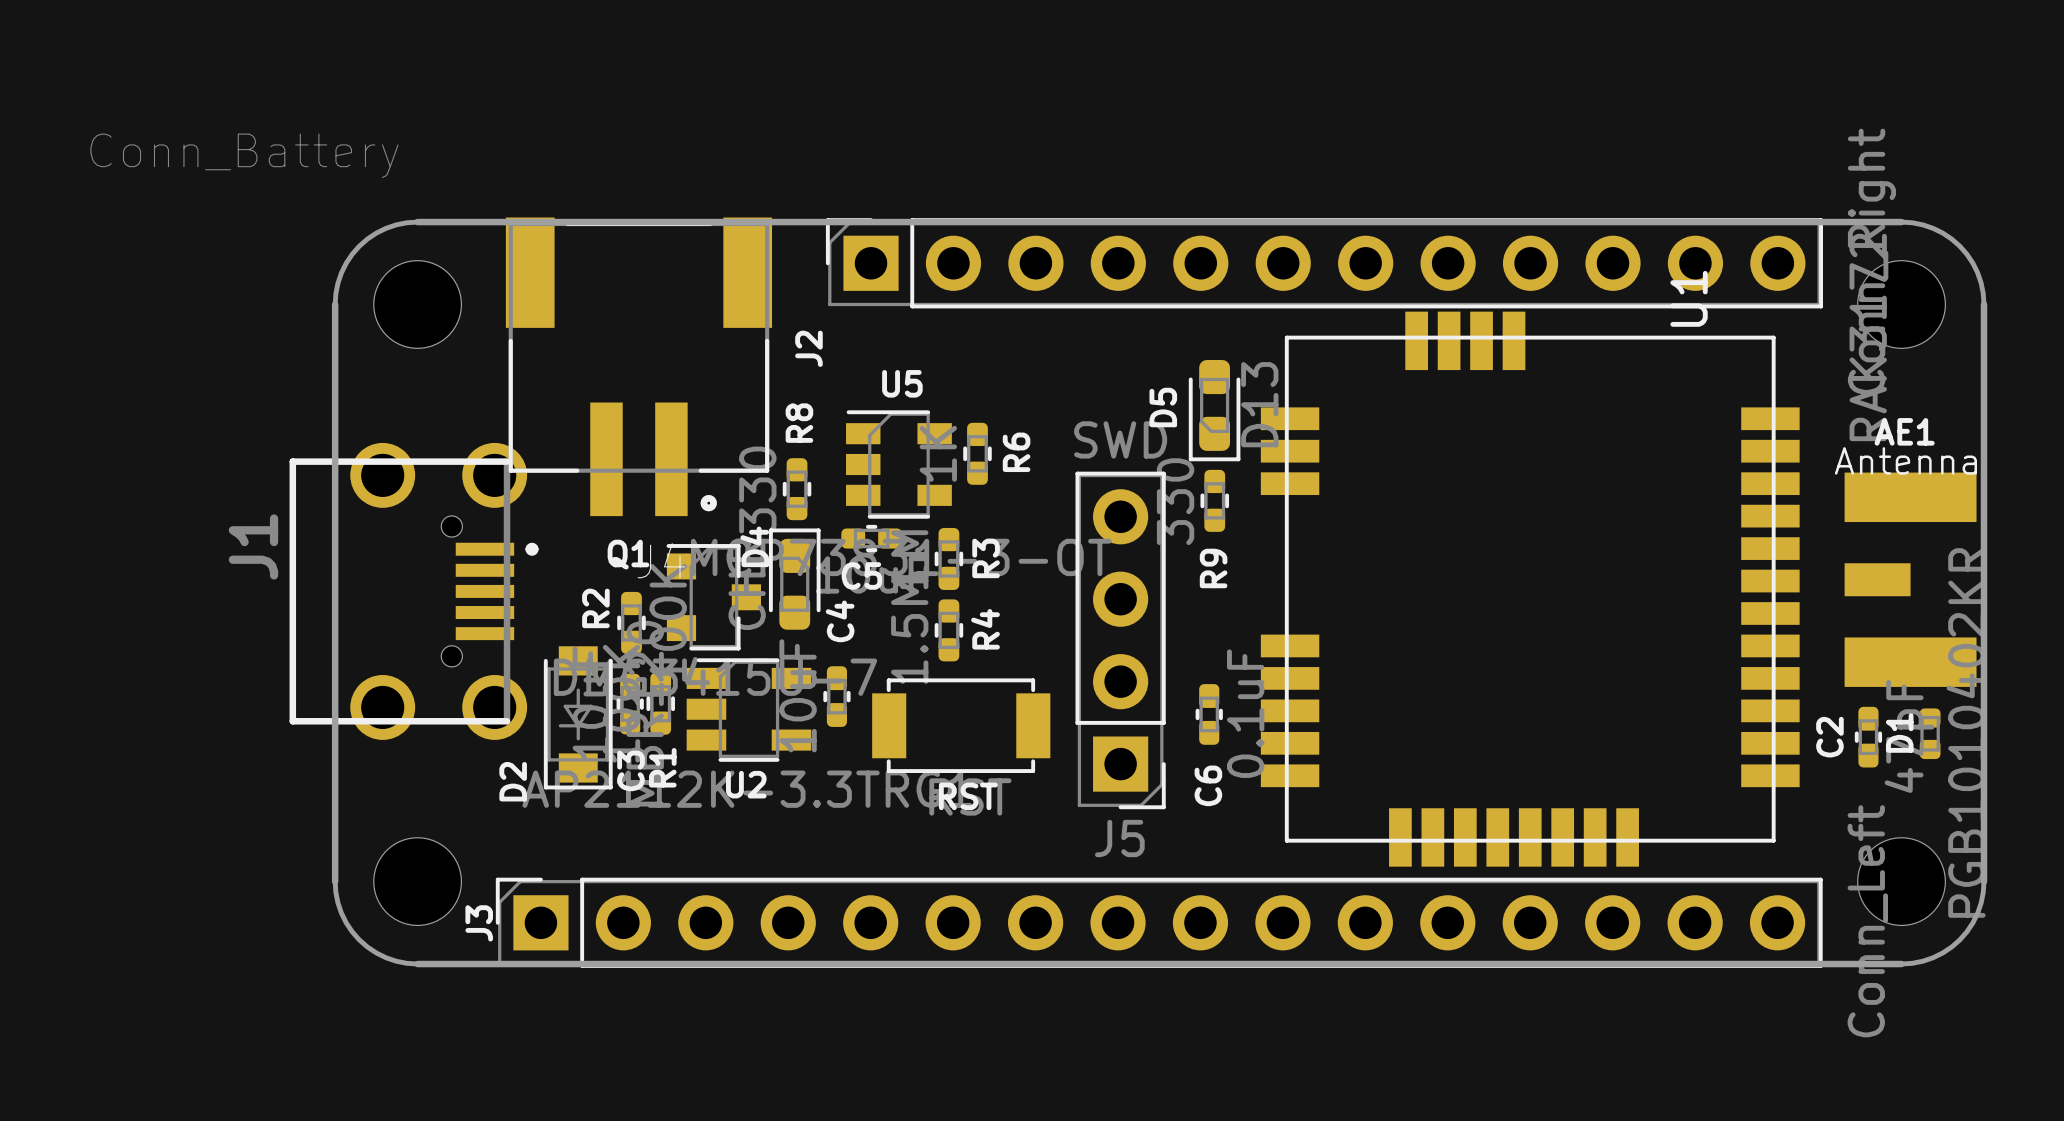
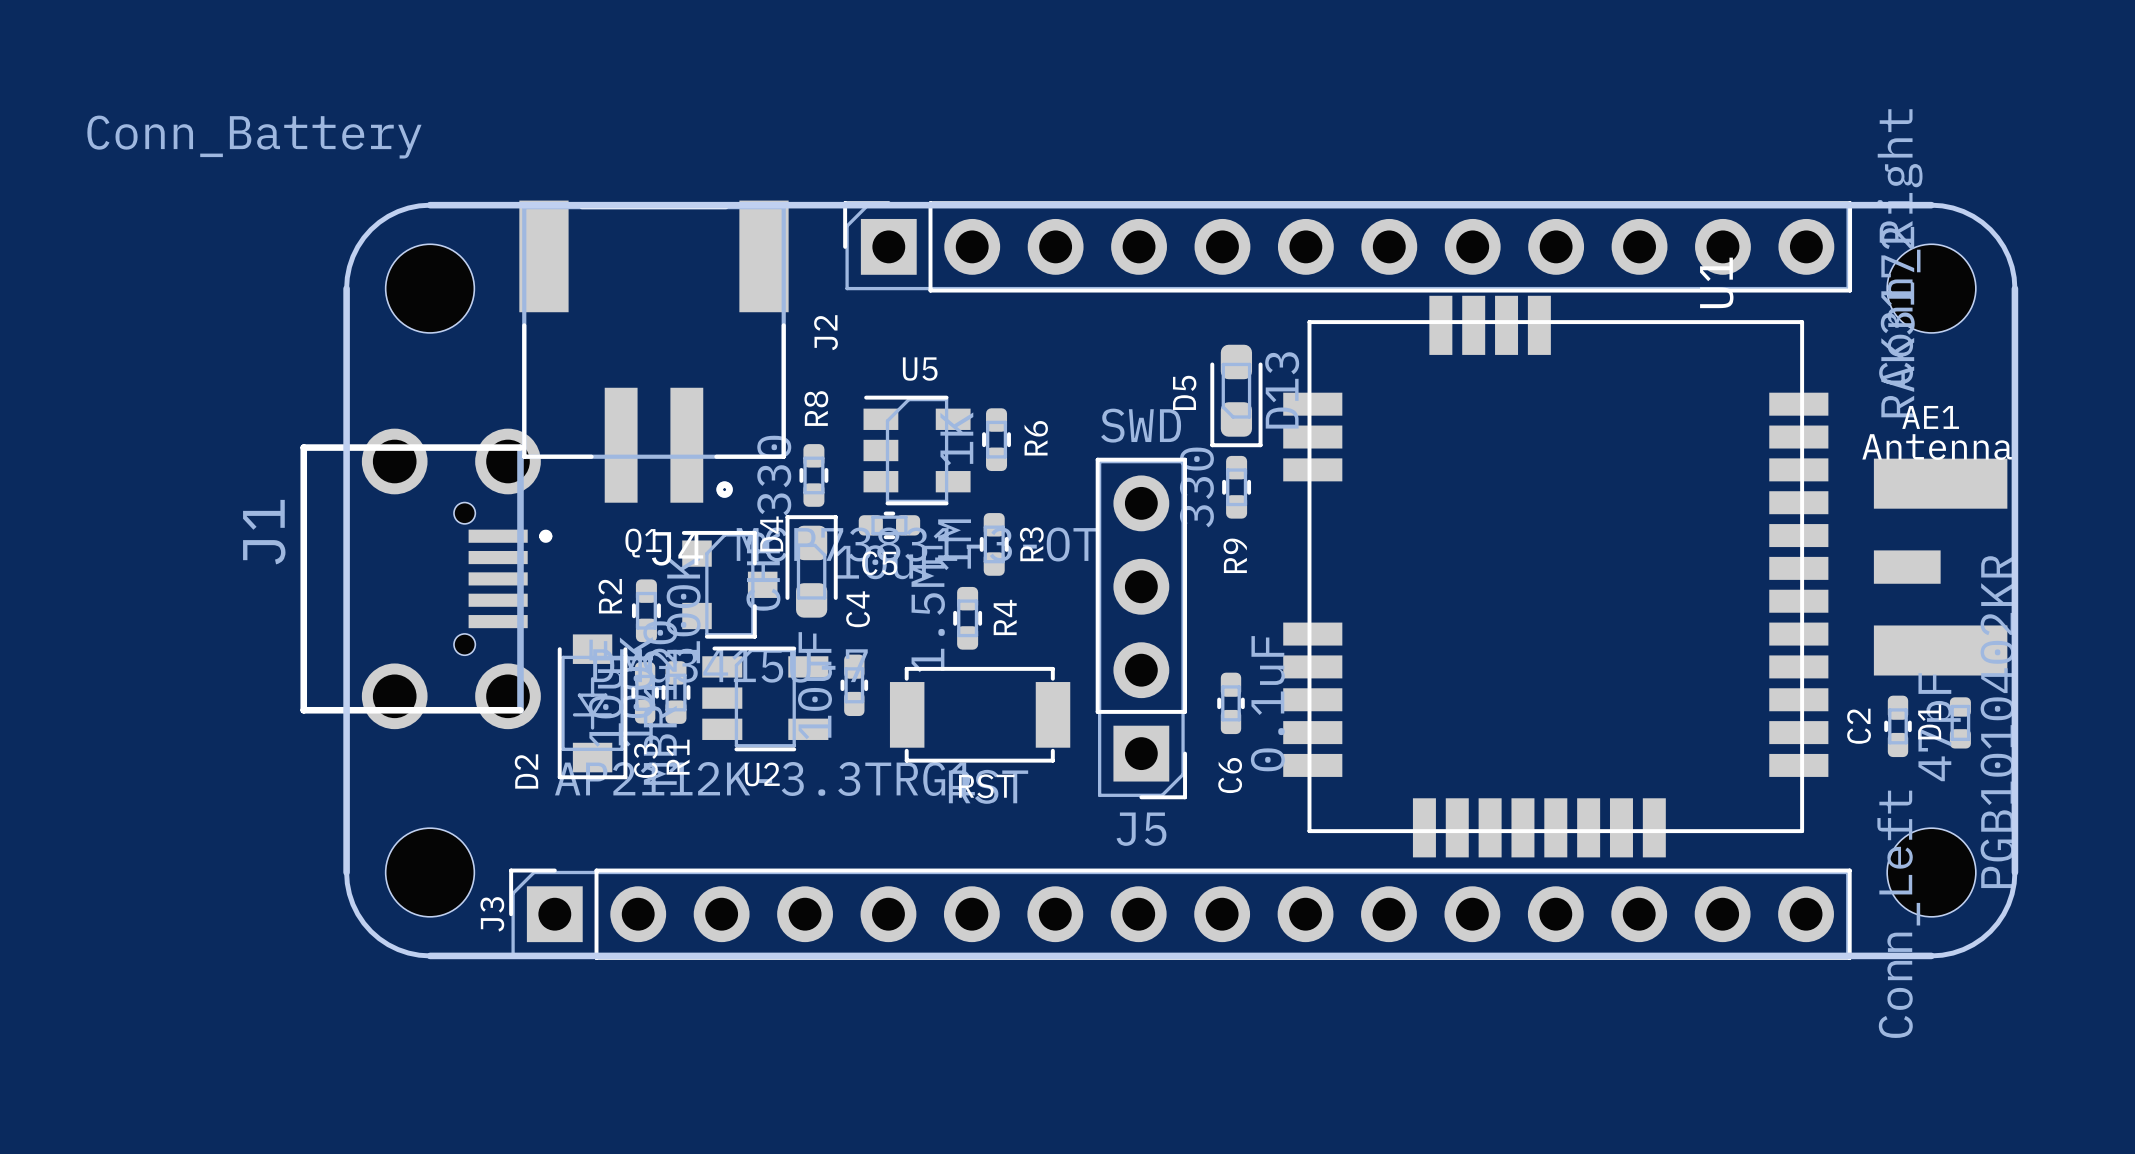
R3 position: (948, 558) -> (994, 544)

